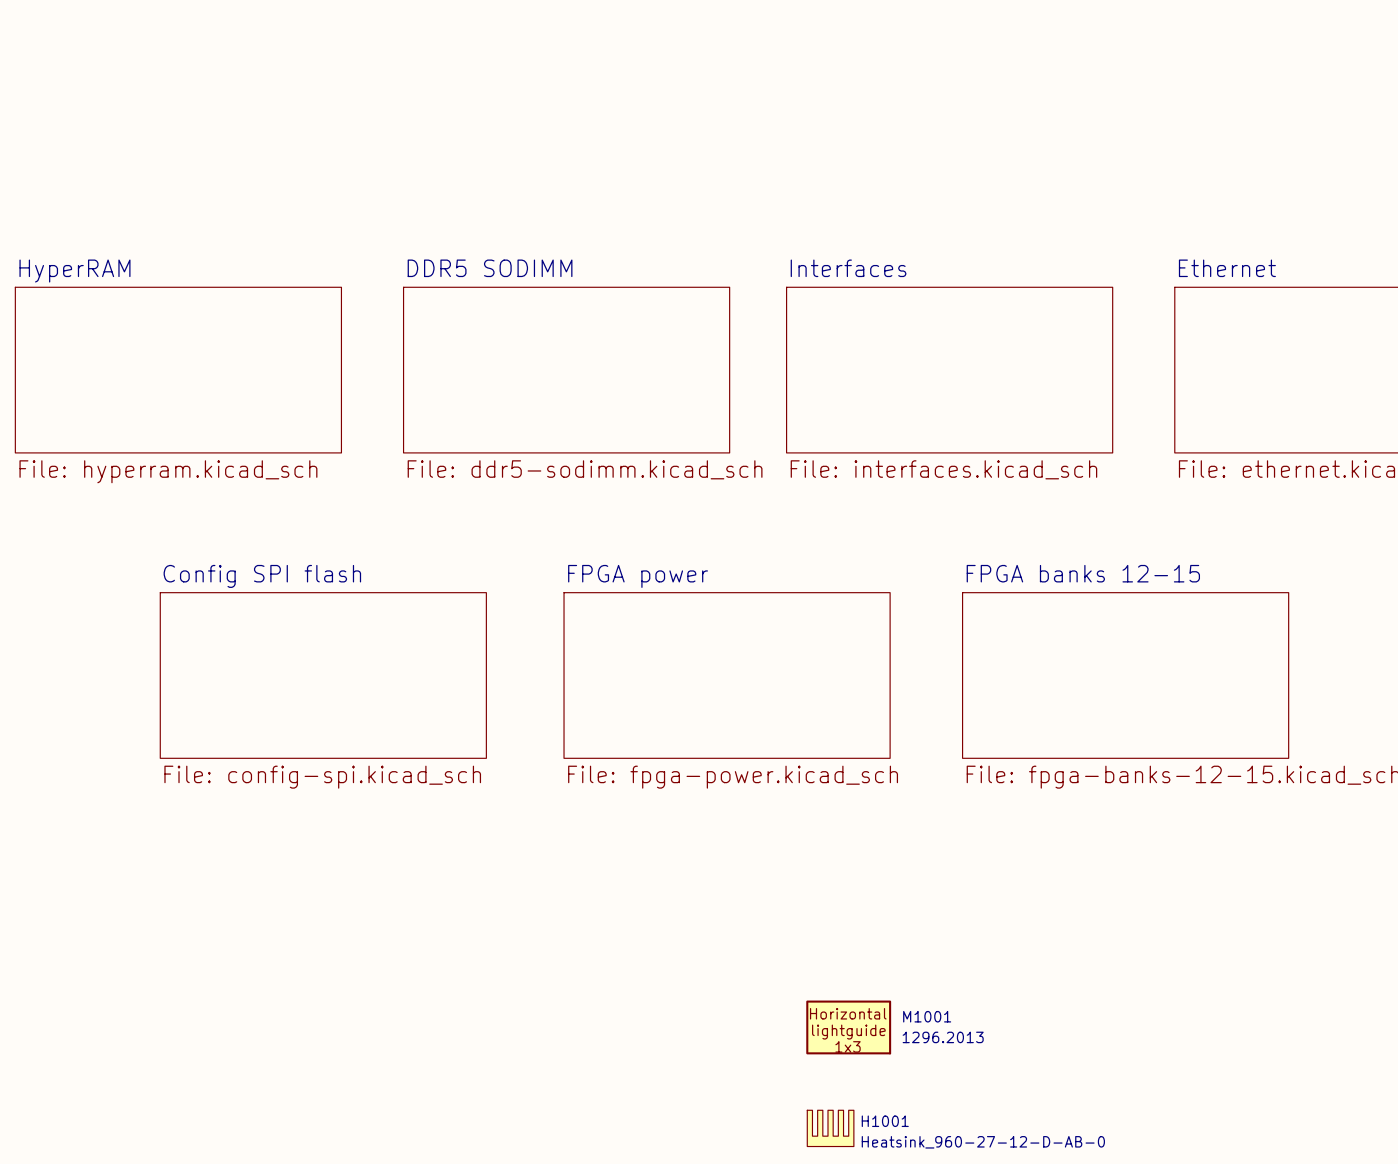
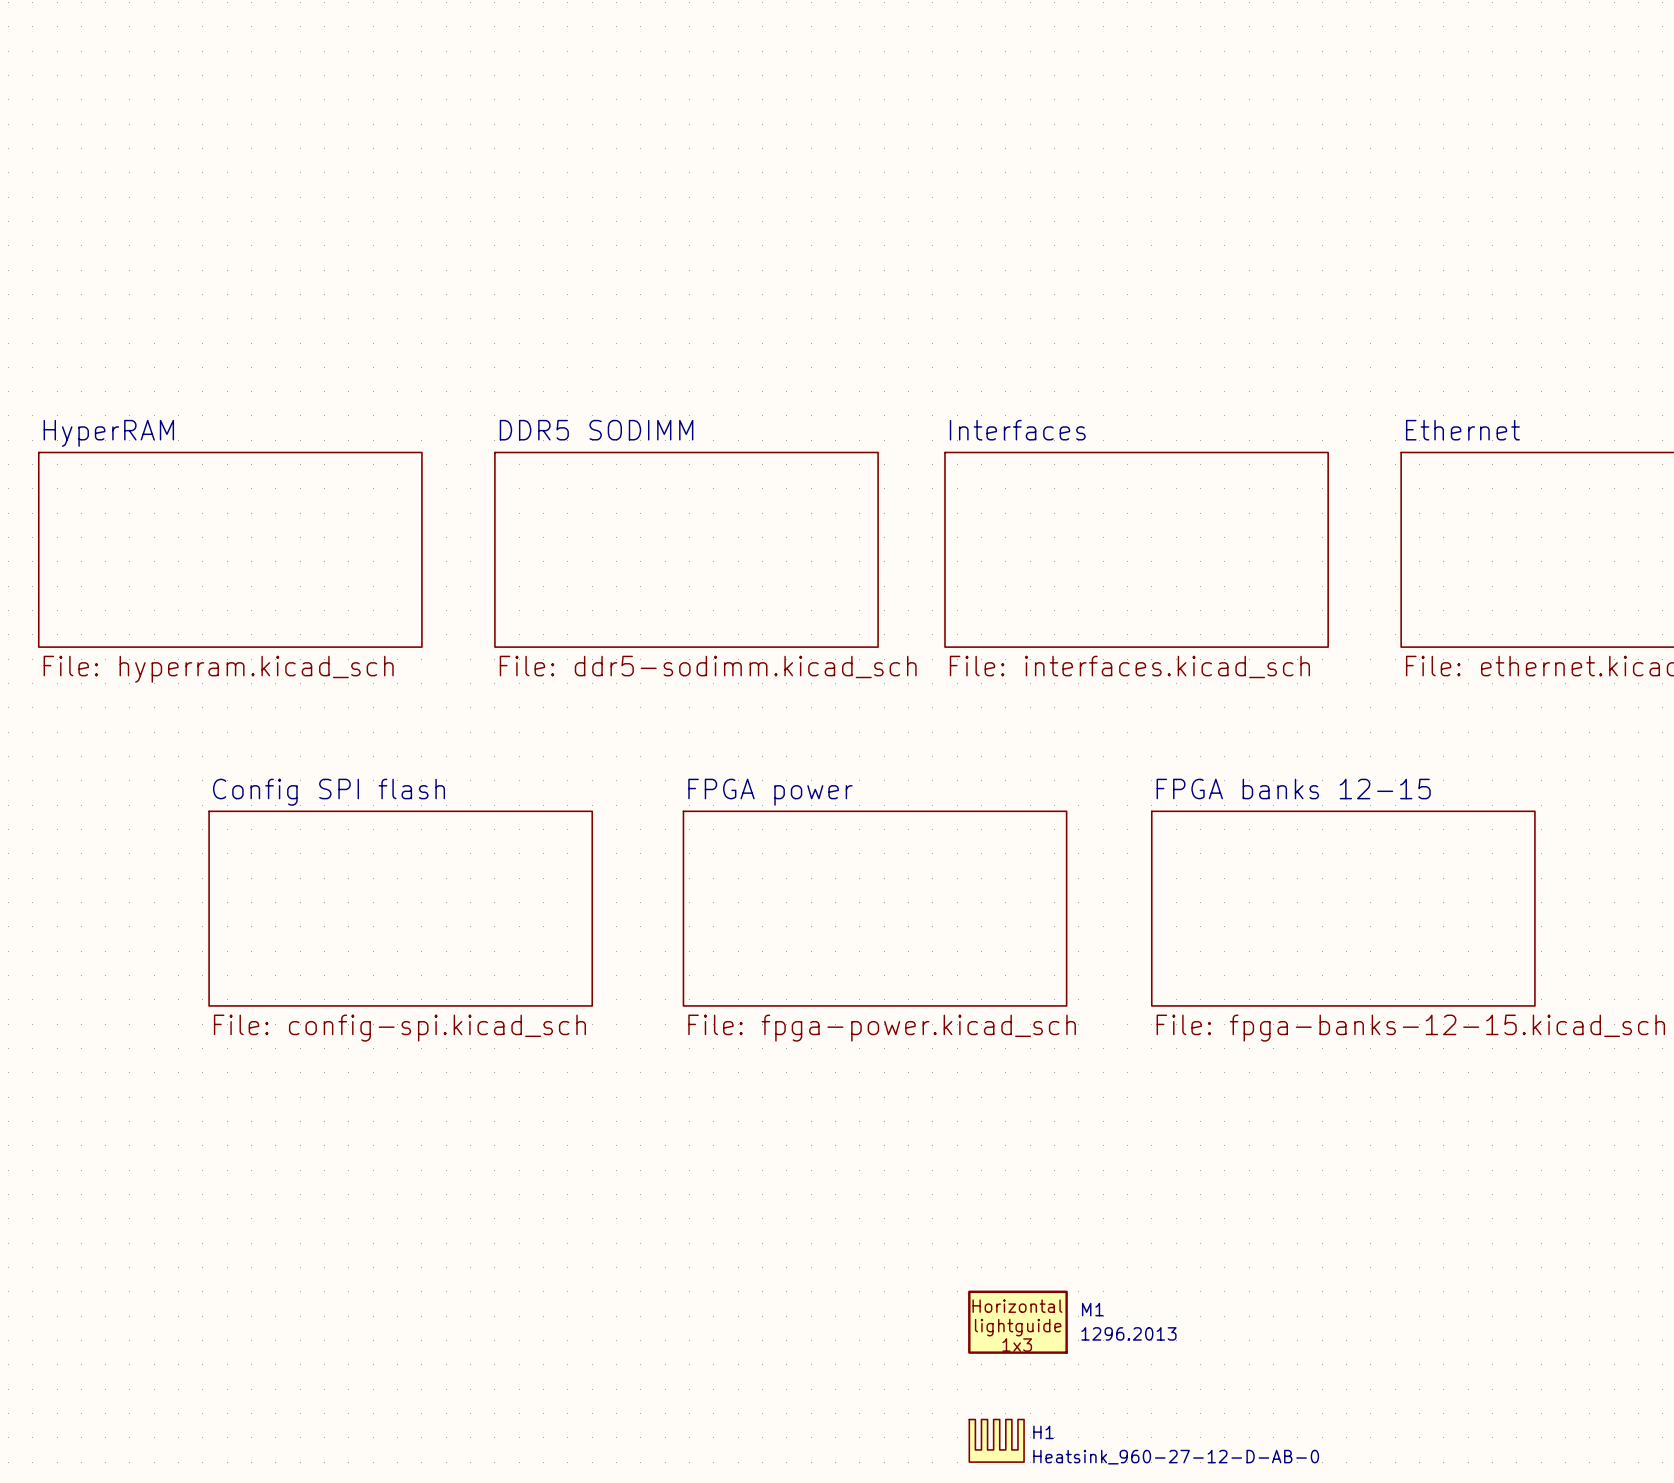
M1001 name: M1001 (927, 1016) -> M1 (1092, 1309)
H1001 name: H1001 (885, 1121) -> H1 (1043, 1432)

